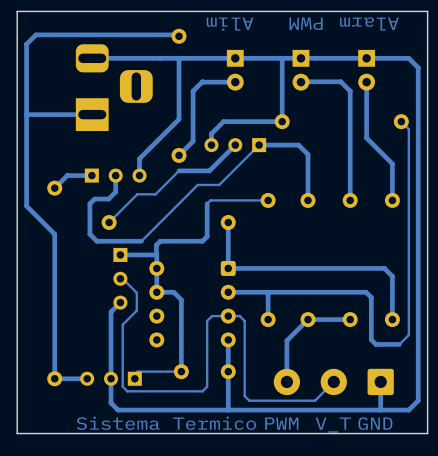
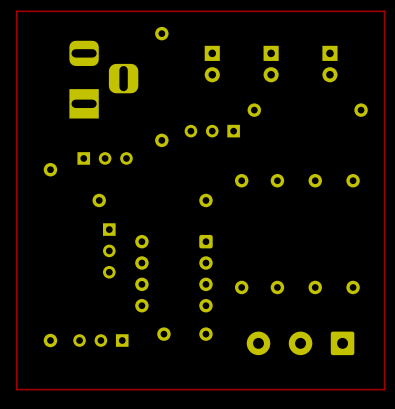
board edge: (427, 11) (17, 11) (17, 433) (427, 433) (427, 11) -> none
top track: none -> (384, 11) (16, 11) (16, 389) (384, 389) (384, 11)
text: PWM (306, 23) -> none
text: Alarm (369, 23) -> none
text: Alim (230, 24) -> none
bottom track: (179, 36) (35, 34) (26, 44) (26, 206) (54, 234) (54, 378) (87, 378) -> none
bottom track: (92, 58) (408, 58) (418, 67) (418, 400) (408, 410) (118, 410) (111, 403) (111, 311) (120, 302) -> none
bottom track: (179, 58) (179, 119) (139, 158) (139, 175) -> none
bottom track: (282, 58) (282, 121) (223, 121) (211, 133) (211, 145) -> none
bottom track: (235, 82) (202, 81) (193, 91) (193, 141) (180, 155) -> none
bottom track: (300, 82) (340, 81) (350, 91) (350, 200) -> none
bottom track: (366, 82) (366, 138) (392, 163) (392, 200) -> none
bottom track: (92, 114) (26, 114) -> none
bottom track: (401, 121) (408, 129) (408, 335) (399, 344) (376, 344) (371, 339) (371, 297) (366, 292) (228, 292) -> none
bottom track: (235, 145) (209, 170) (179, 170) (155, 194) (137, 194) (109, 222) -> none
bottom track: (91, 175) (67, 175) (54, 188) -> none
bottom track: (115, 175) (115, 191) (108, 199) (94, 199) (89, 203) (89, 234) (96, 241) (141, 241) (197, 184) (219, 184) (259, 145) (298, 145) (308, 154) (308, 200) -> none
bottom track: (268, 200) (210, 200) (207, 203) (207, 236) (202, 241) (160, 241) (156, 245) (156, 254) -> none
bottom track: (228, 222) (228, 268) (384, 268) (392, 276) (392, 319) -> none
bottom track: (156, 254) (120, 254) (122, 255) -> none
bottom track: (156, 254) (156, 292) (173, 292) (181, 299) (181, 371) (137, 371) (134, 374) (134, 378) -> none
bottom track: (120, 278) (122, 278) (136, 292) (136, 310) (122, 324) (122, 386) (127, 391) (202, 391) (207, 386) (207, 320) (212, 316) (239, 316) (244, 320) (244, 396) (249, 400) (315, 400) (333, 381) -> none
bottom track: (268, 292) (268, 319) -> none
bottom track: (350, 319) (308, 319) (286, 340) (286, 381) (291, 386) -> none
bottom track: (228, 339) (228, 410) -> none
bottom track: (380, 381) (380, 410) -> none
text: Sistema Termico (166, 423) -> none
text: PWM (281, 423) -> none
text: GND (375, 423) -> none
text: V_T (333, 425) -> none

